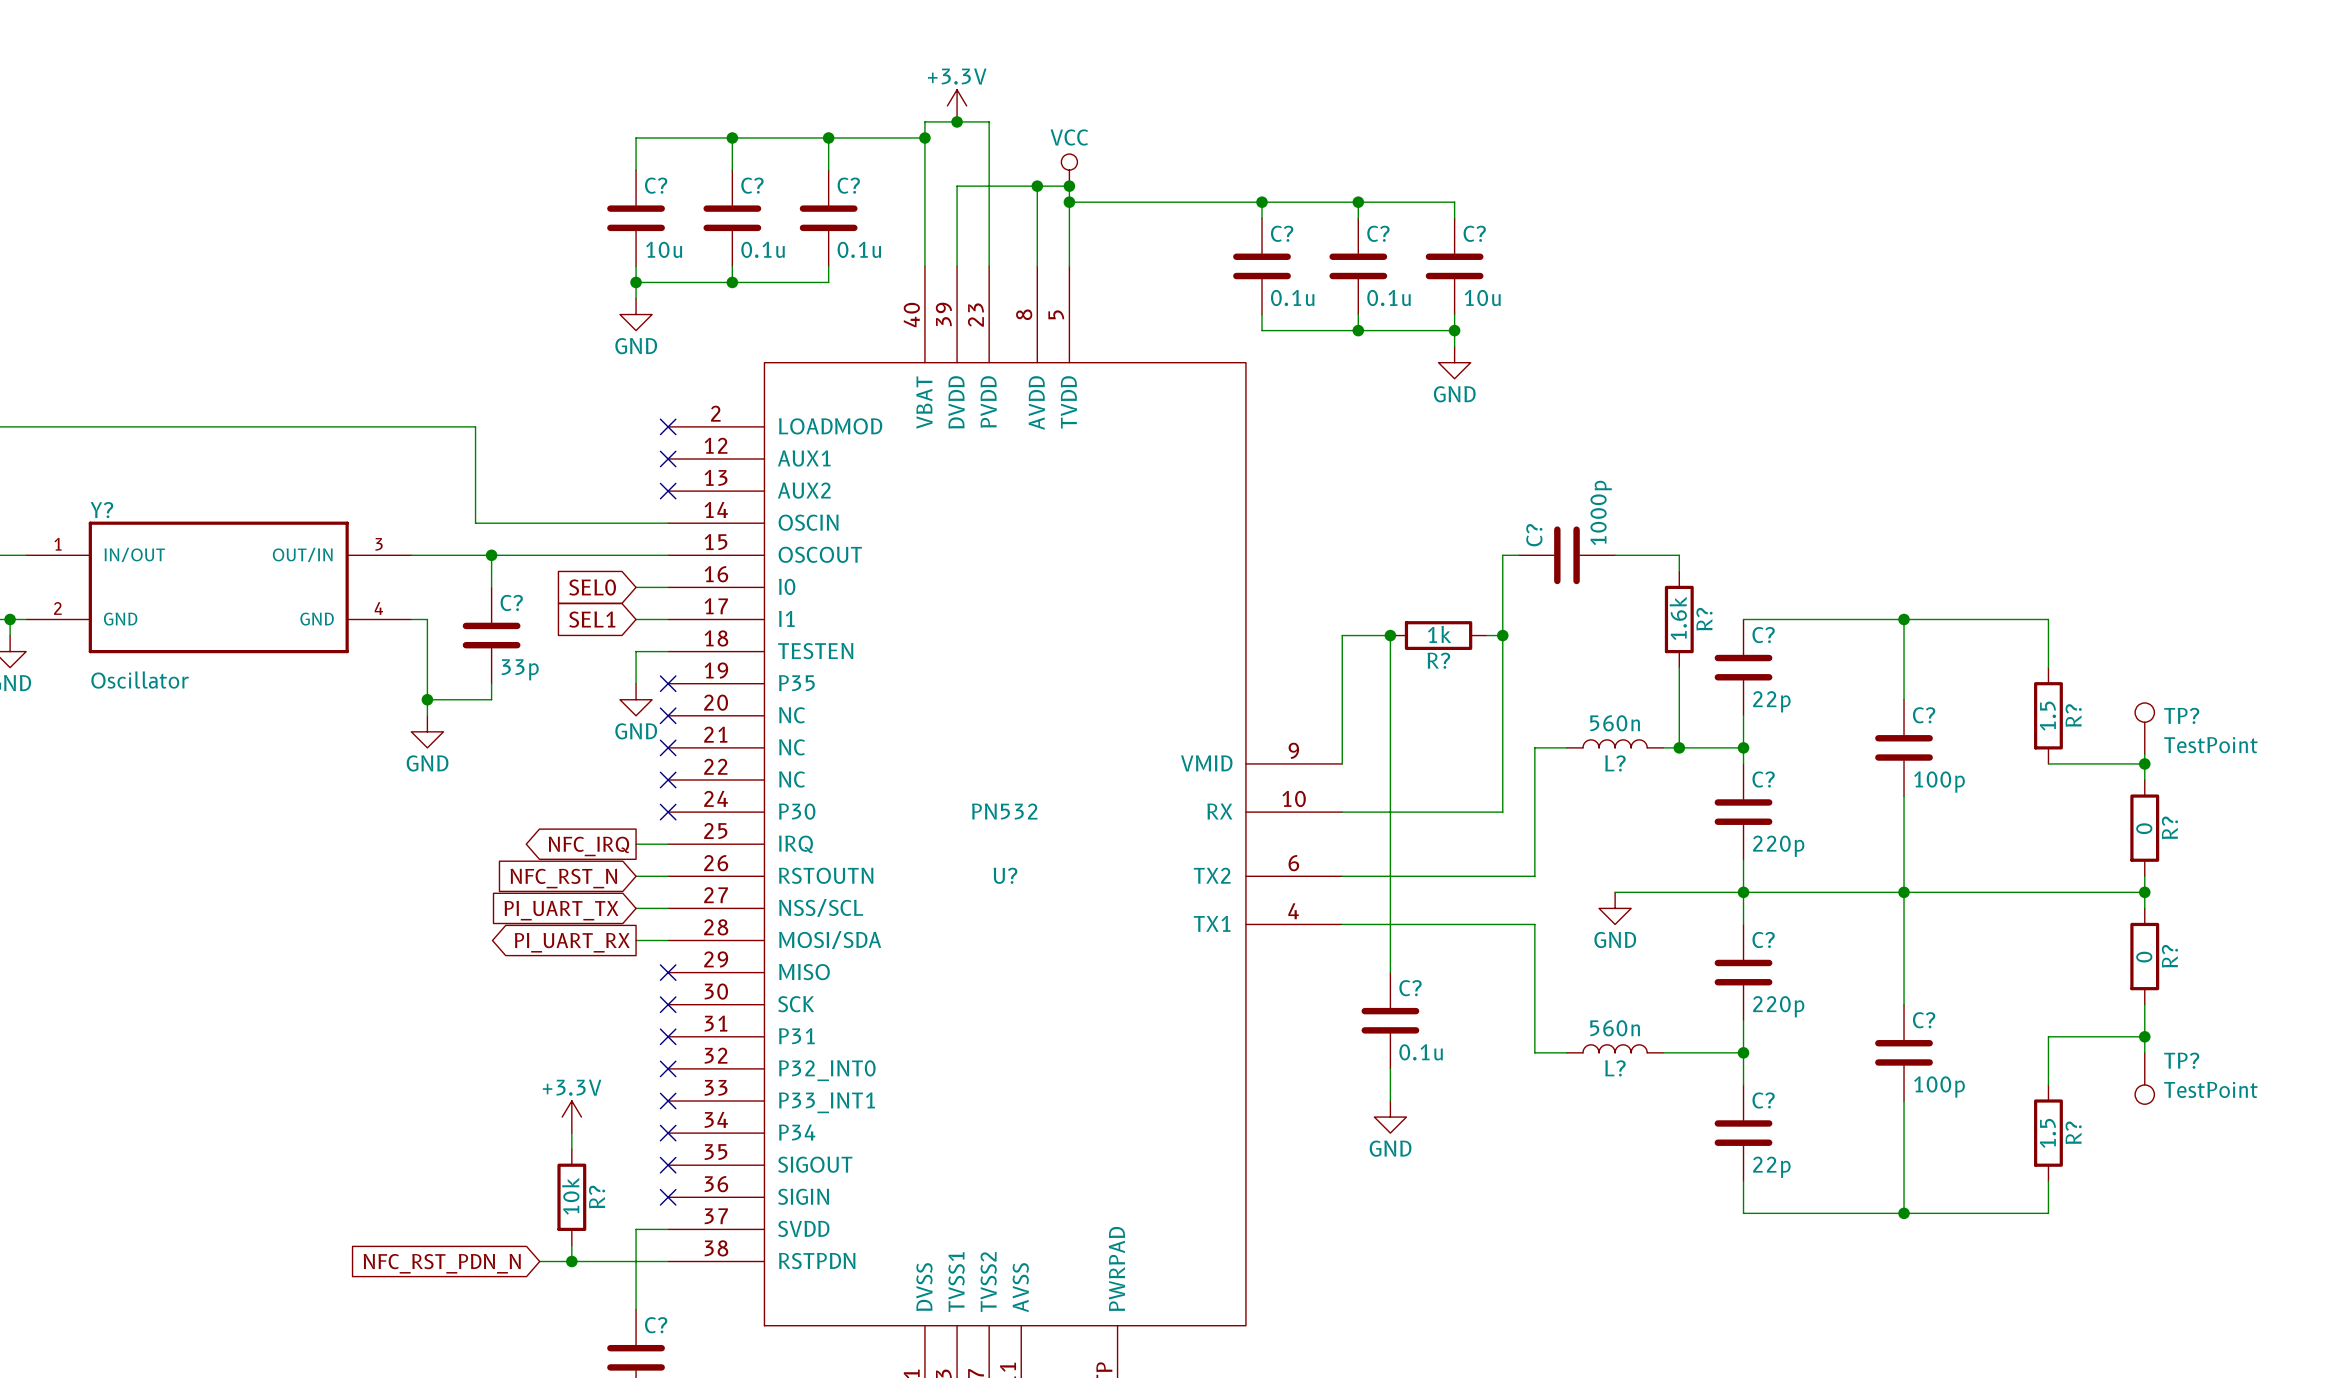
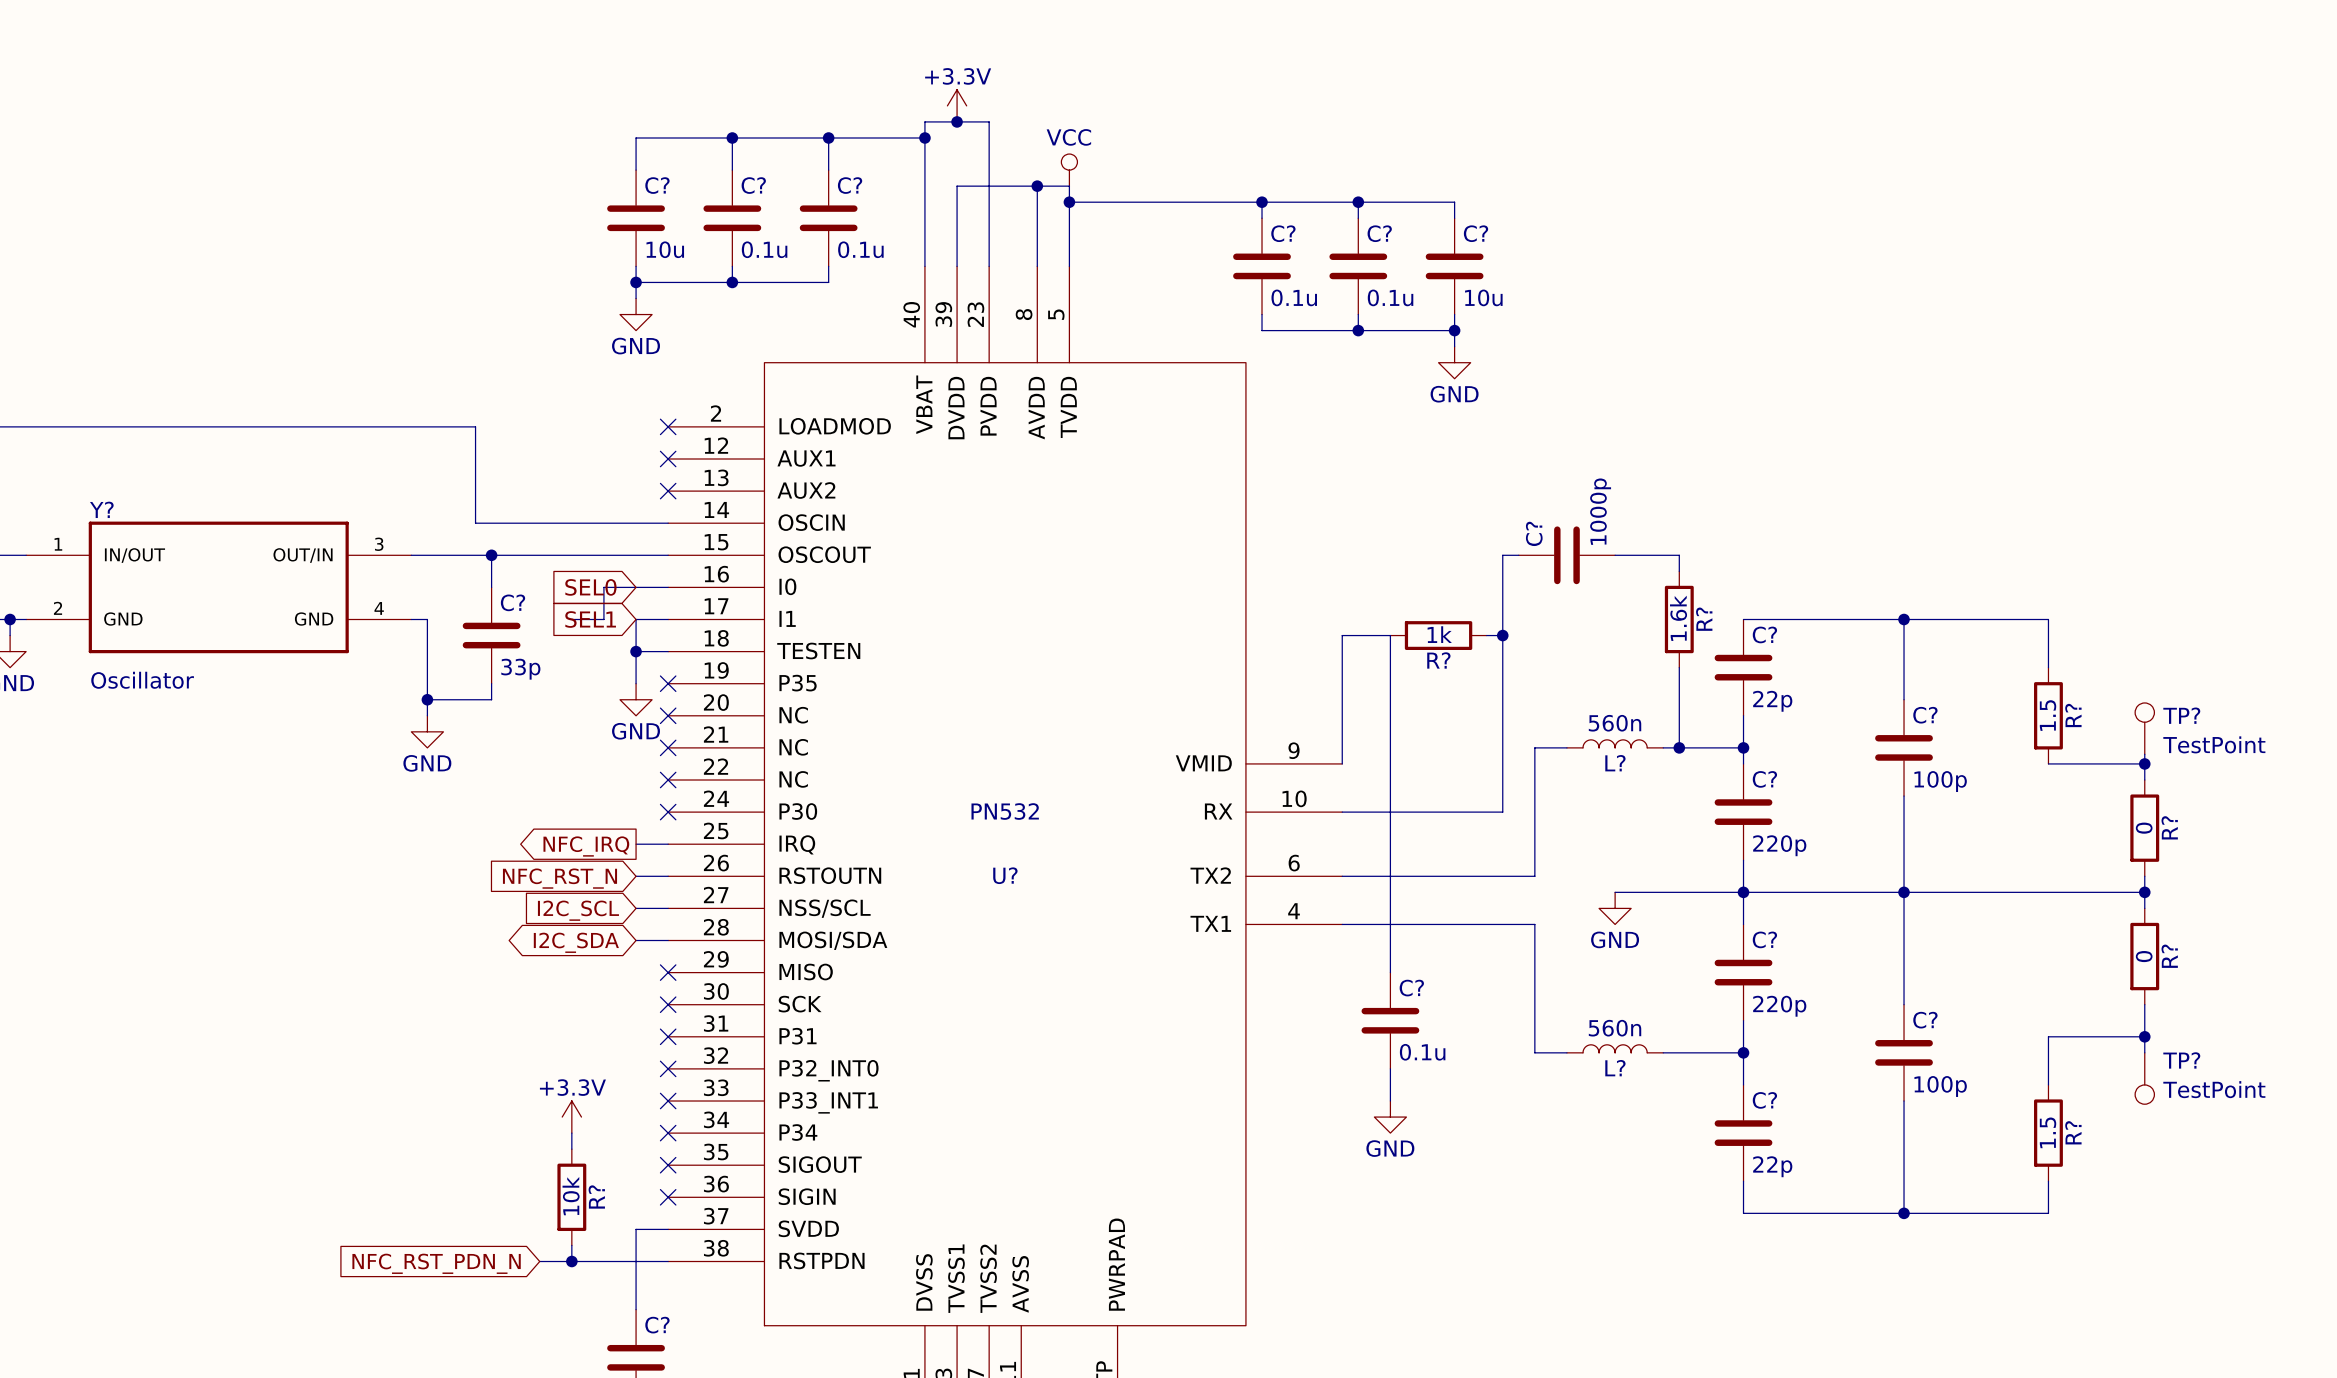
junction: (1069, 186) -> none
wire: none -> (636, 587) (603, 587) (603, 619) (571, 619)
wire: none -> (636, 619) (636, 651)
junction: (1390, 635) -> none
junction: none -> (636, 651)
global label: PI_UART_TX (561, 910) -> I2C_SCL (578, 910)
global label shape: output (572, 942) -> bidirectional (576, 942)
global label: PI_UART_RX (572, 942) -> I2C_SDA (576, 942)

